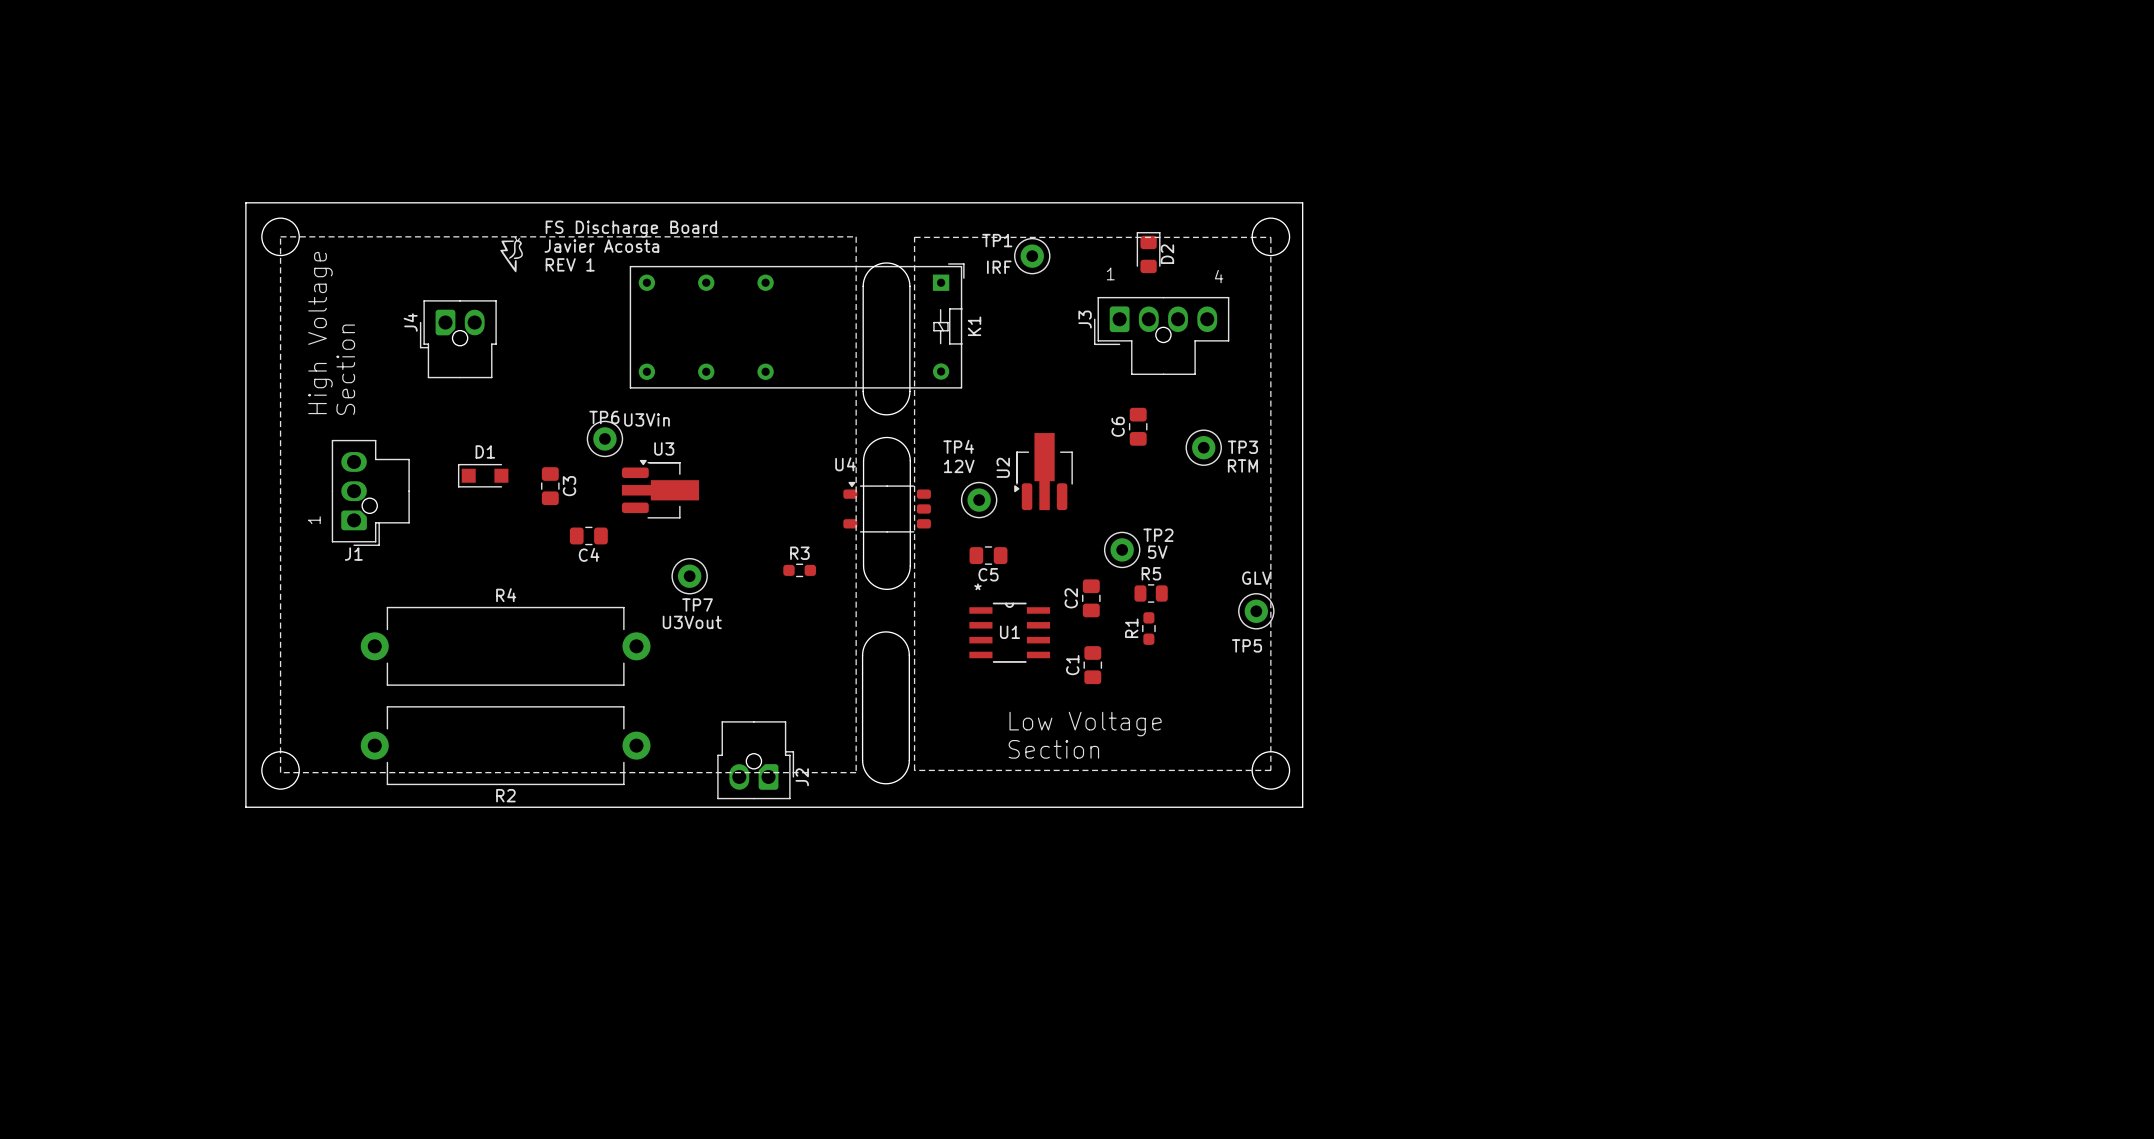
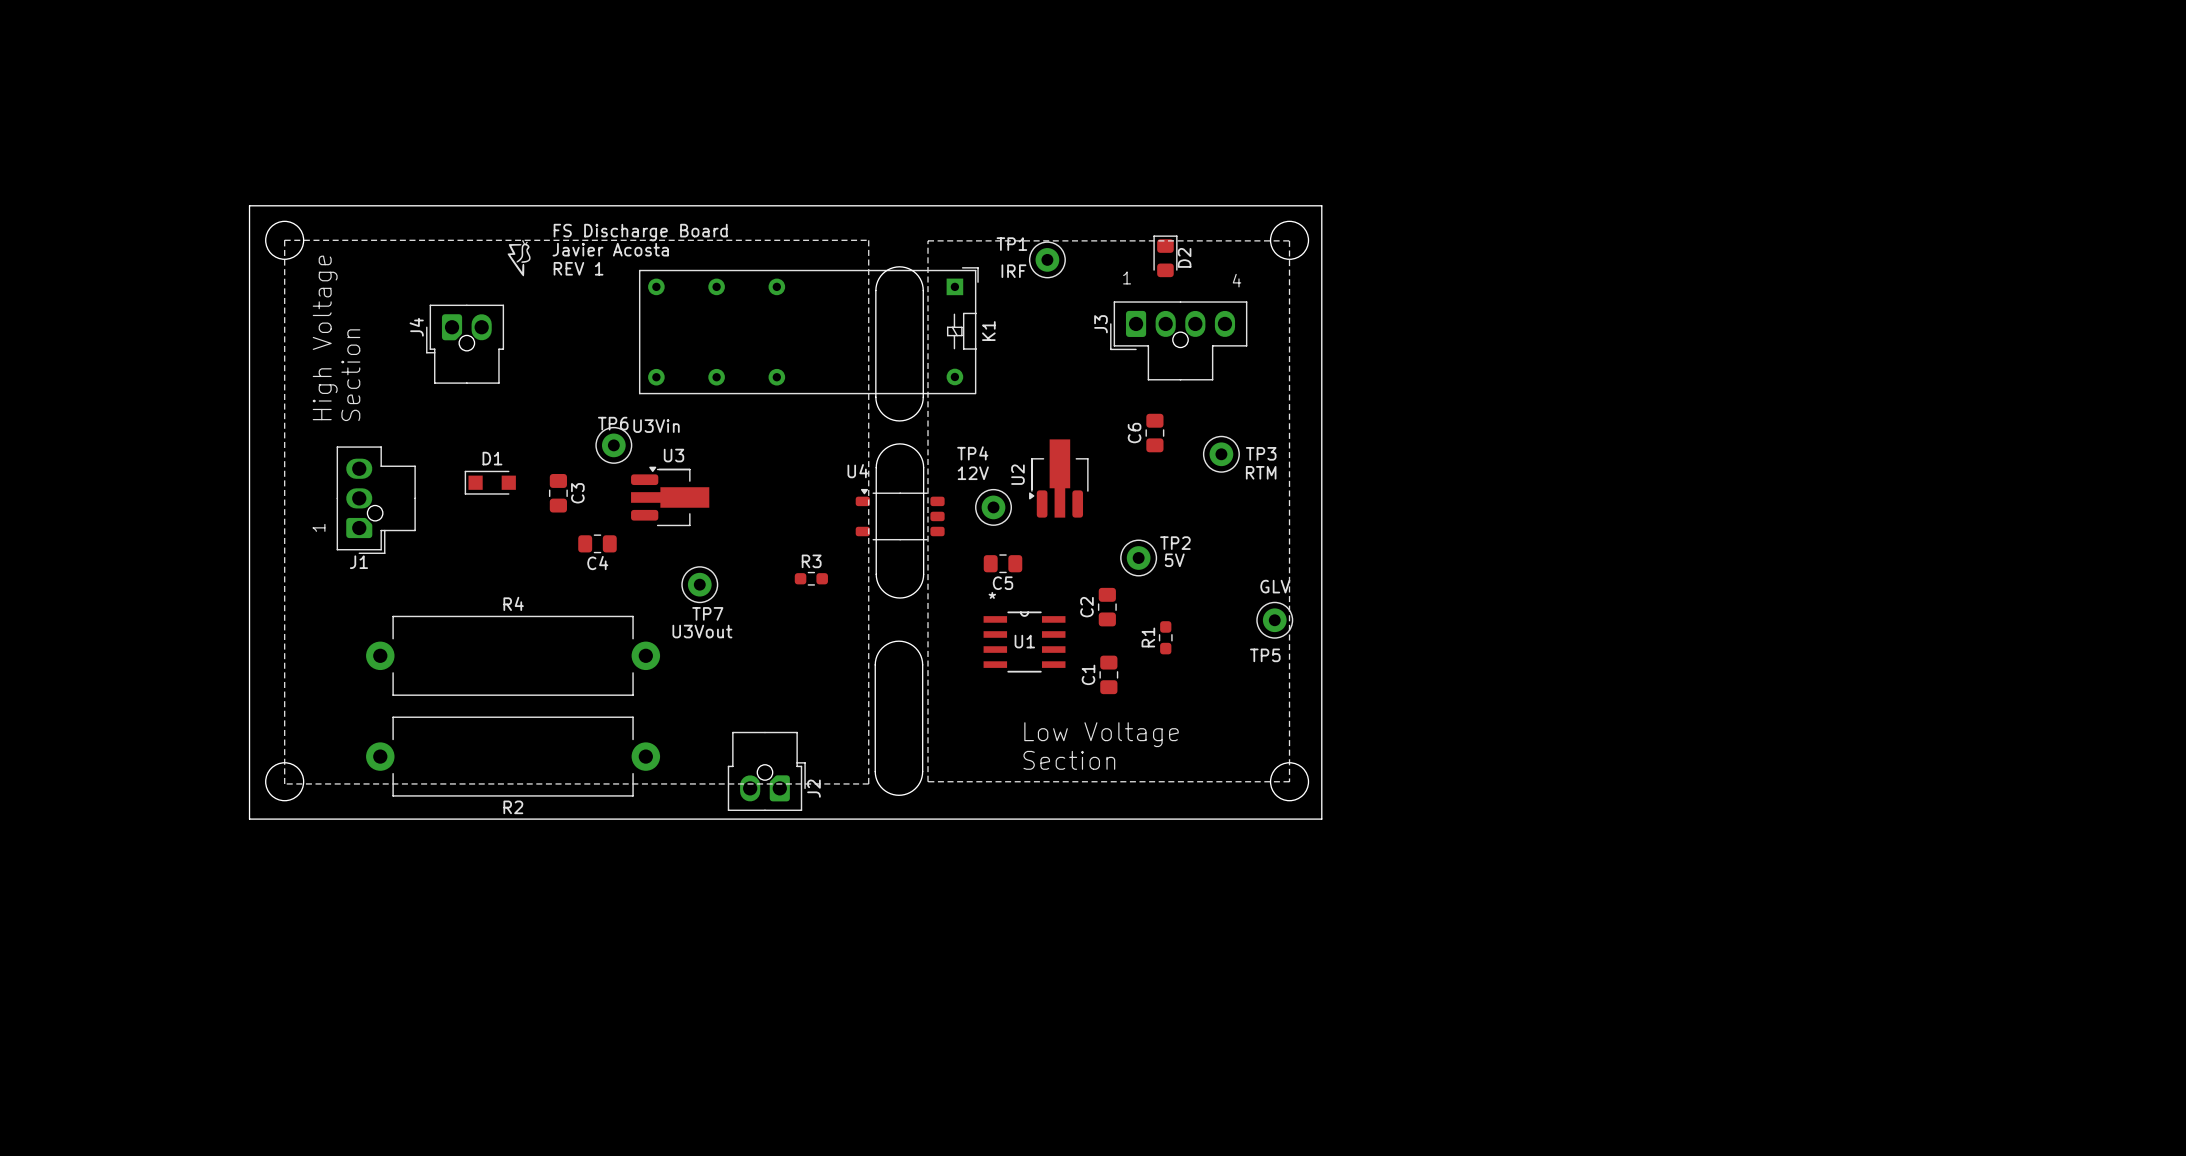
R5: (1151, 593) -> none

